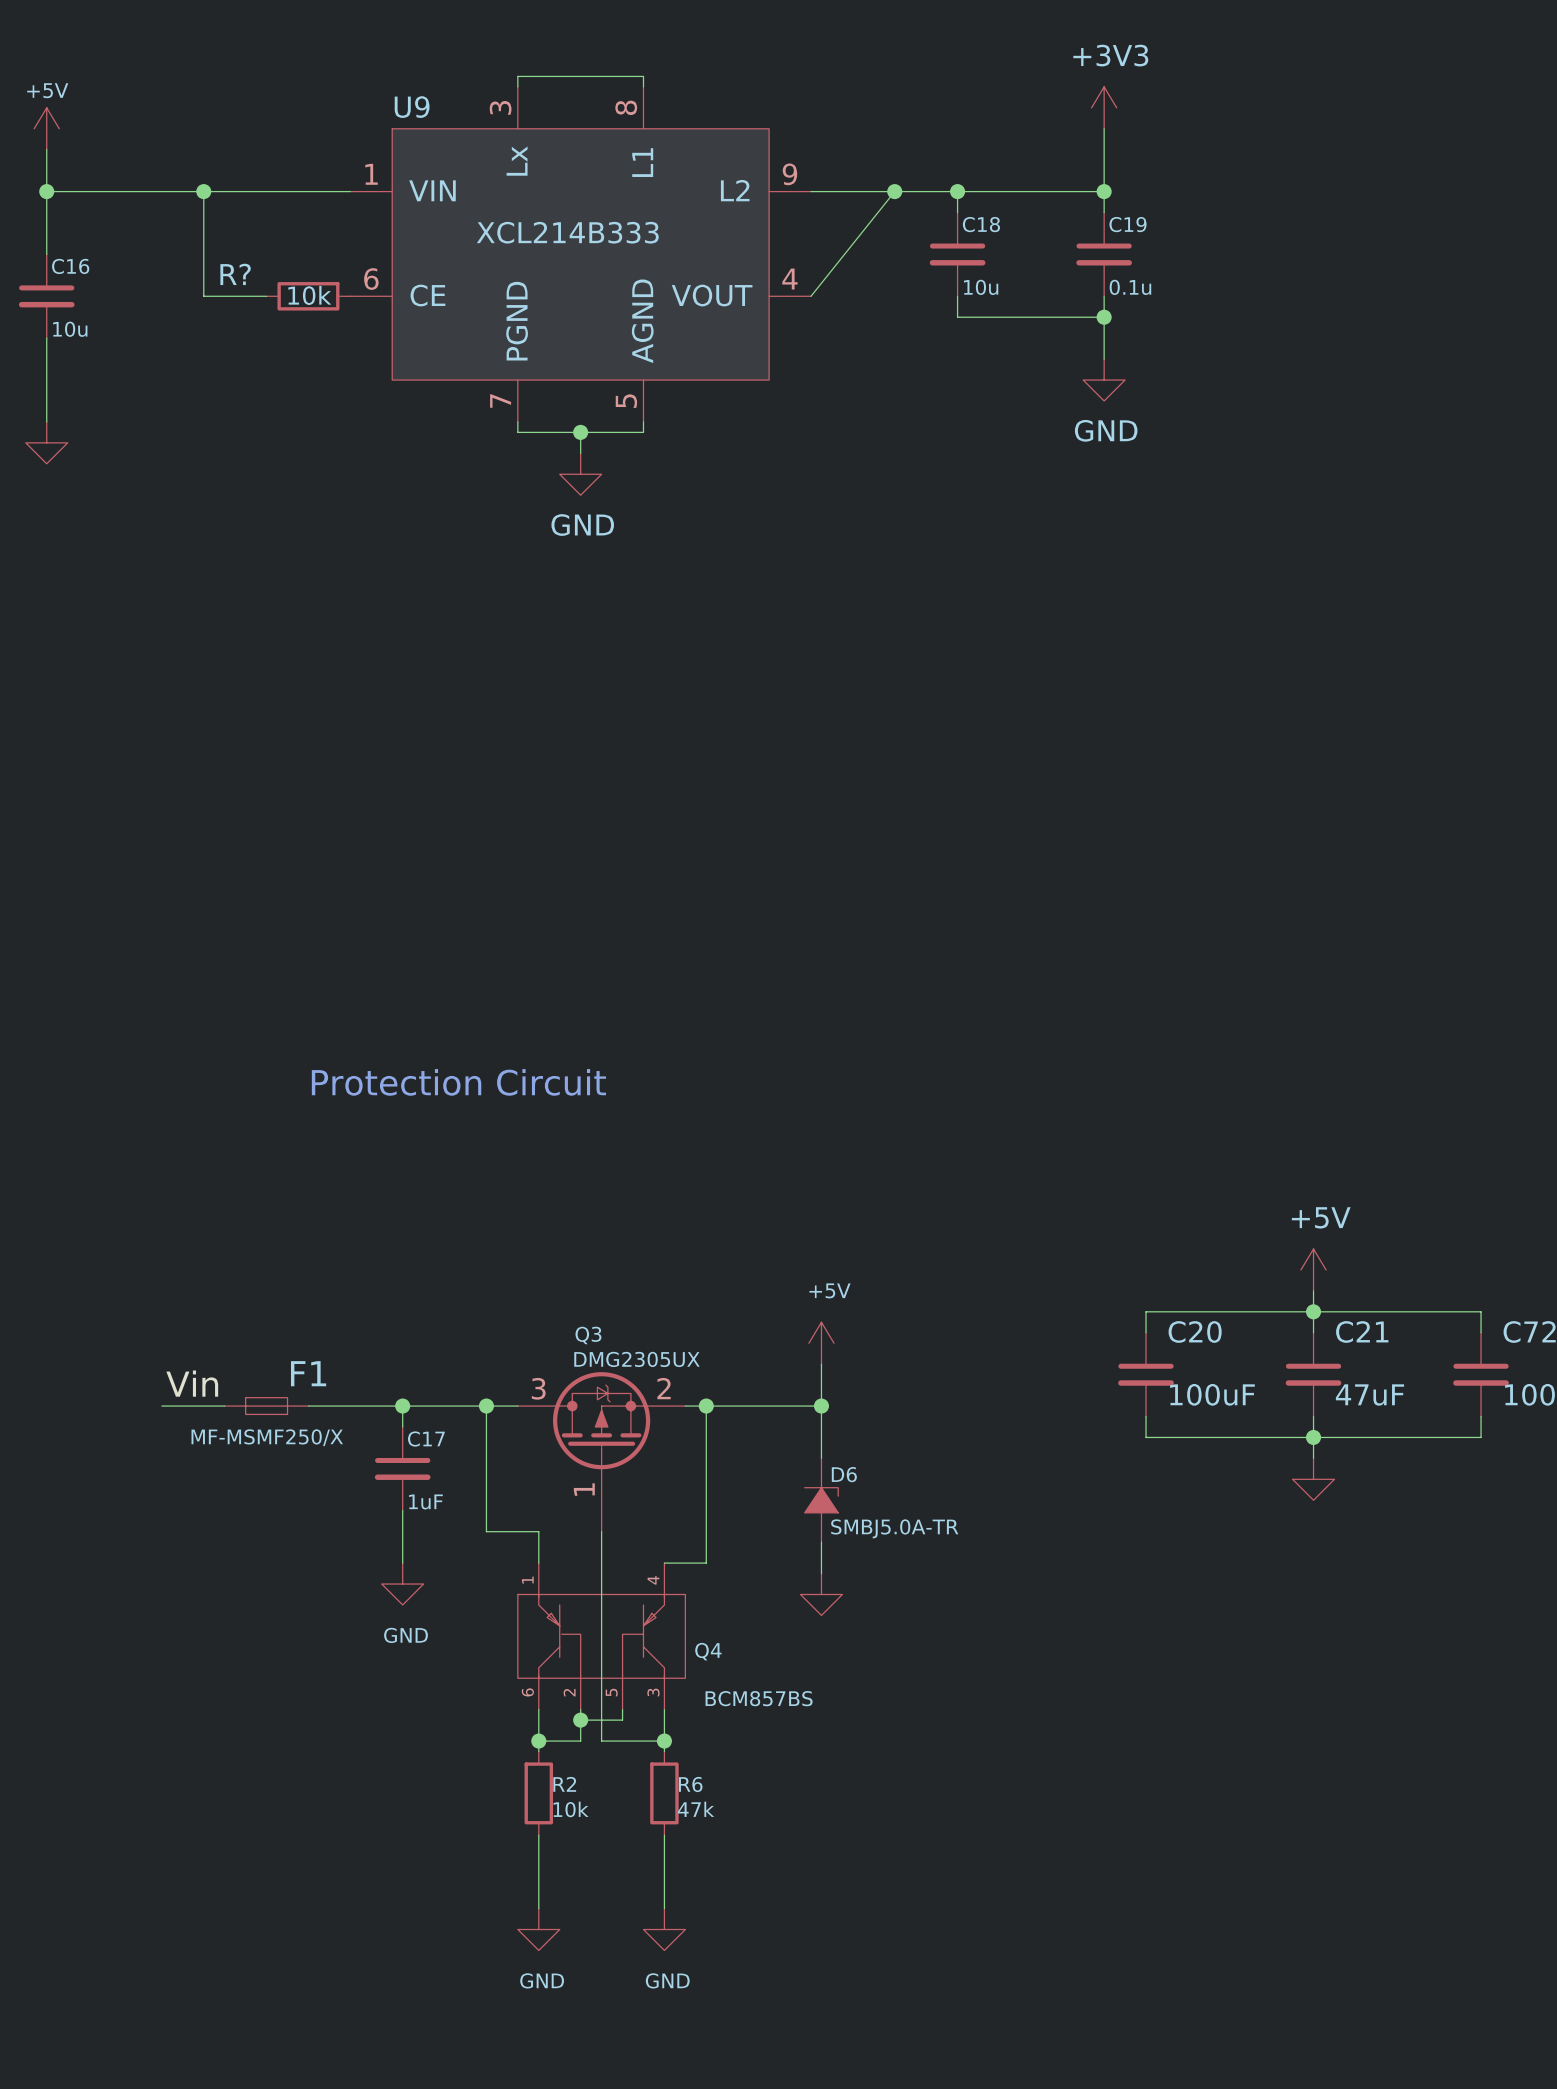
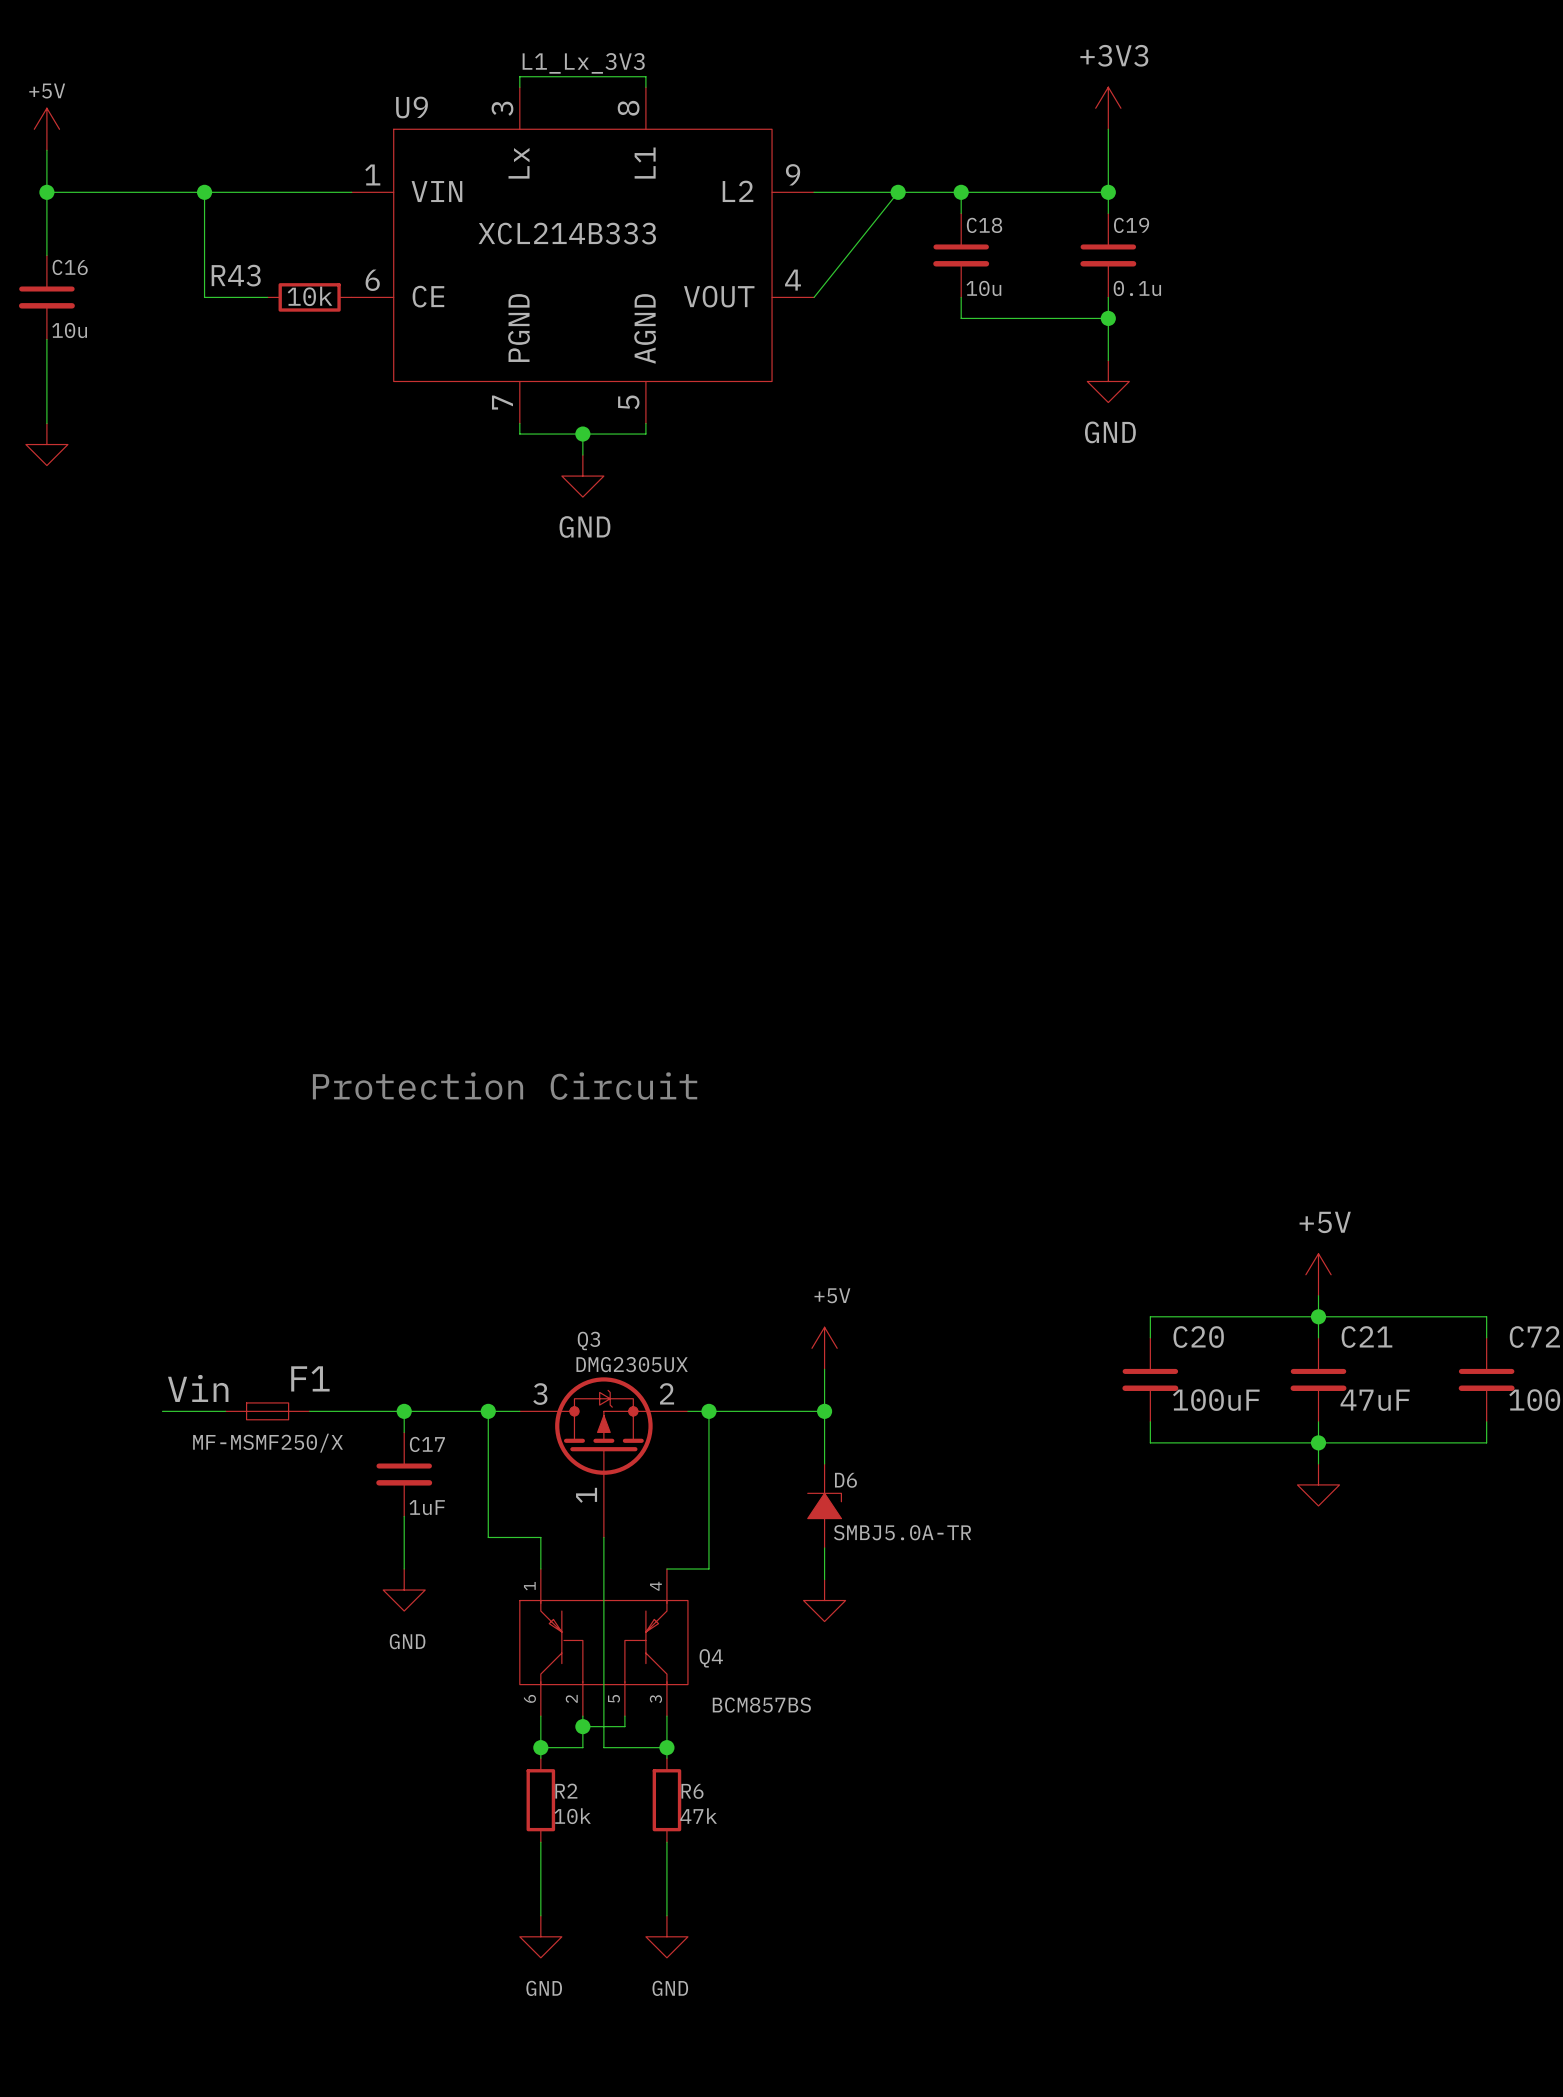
label: none -> L1_Lx_3V3 (583, 63)
R? name: R? (235, 274) -> R43 (236, 275)

